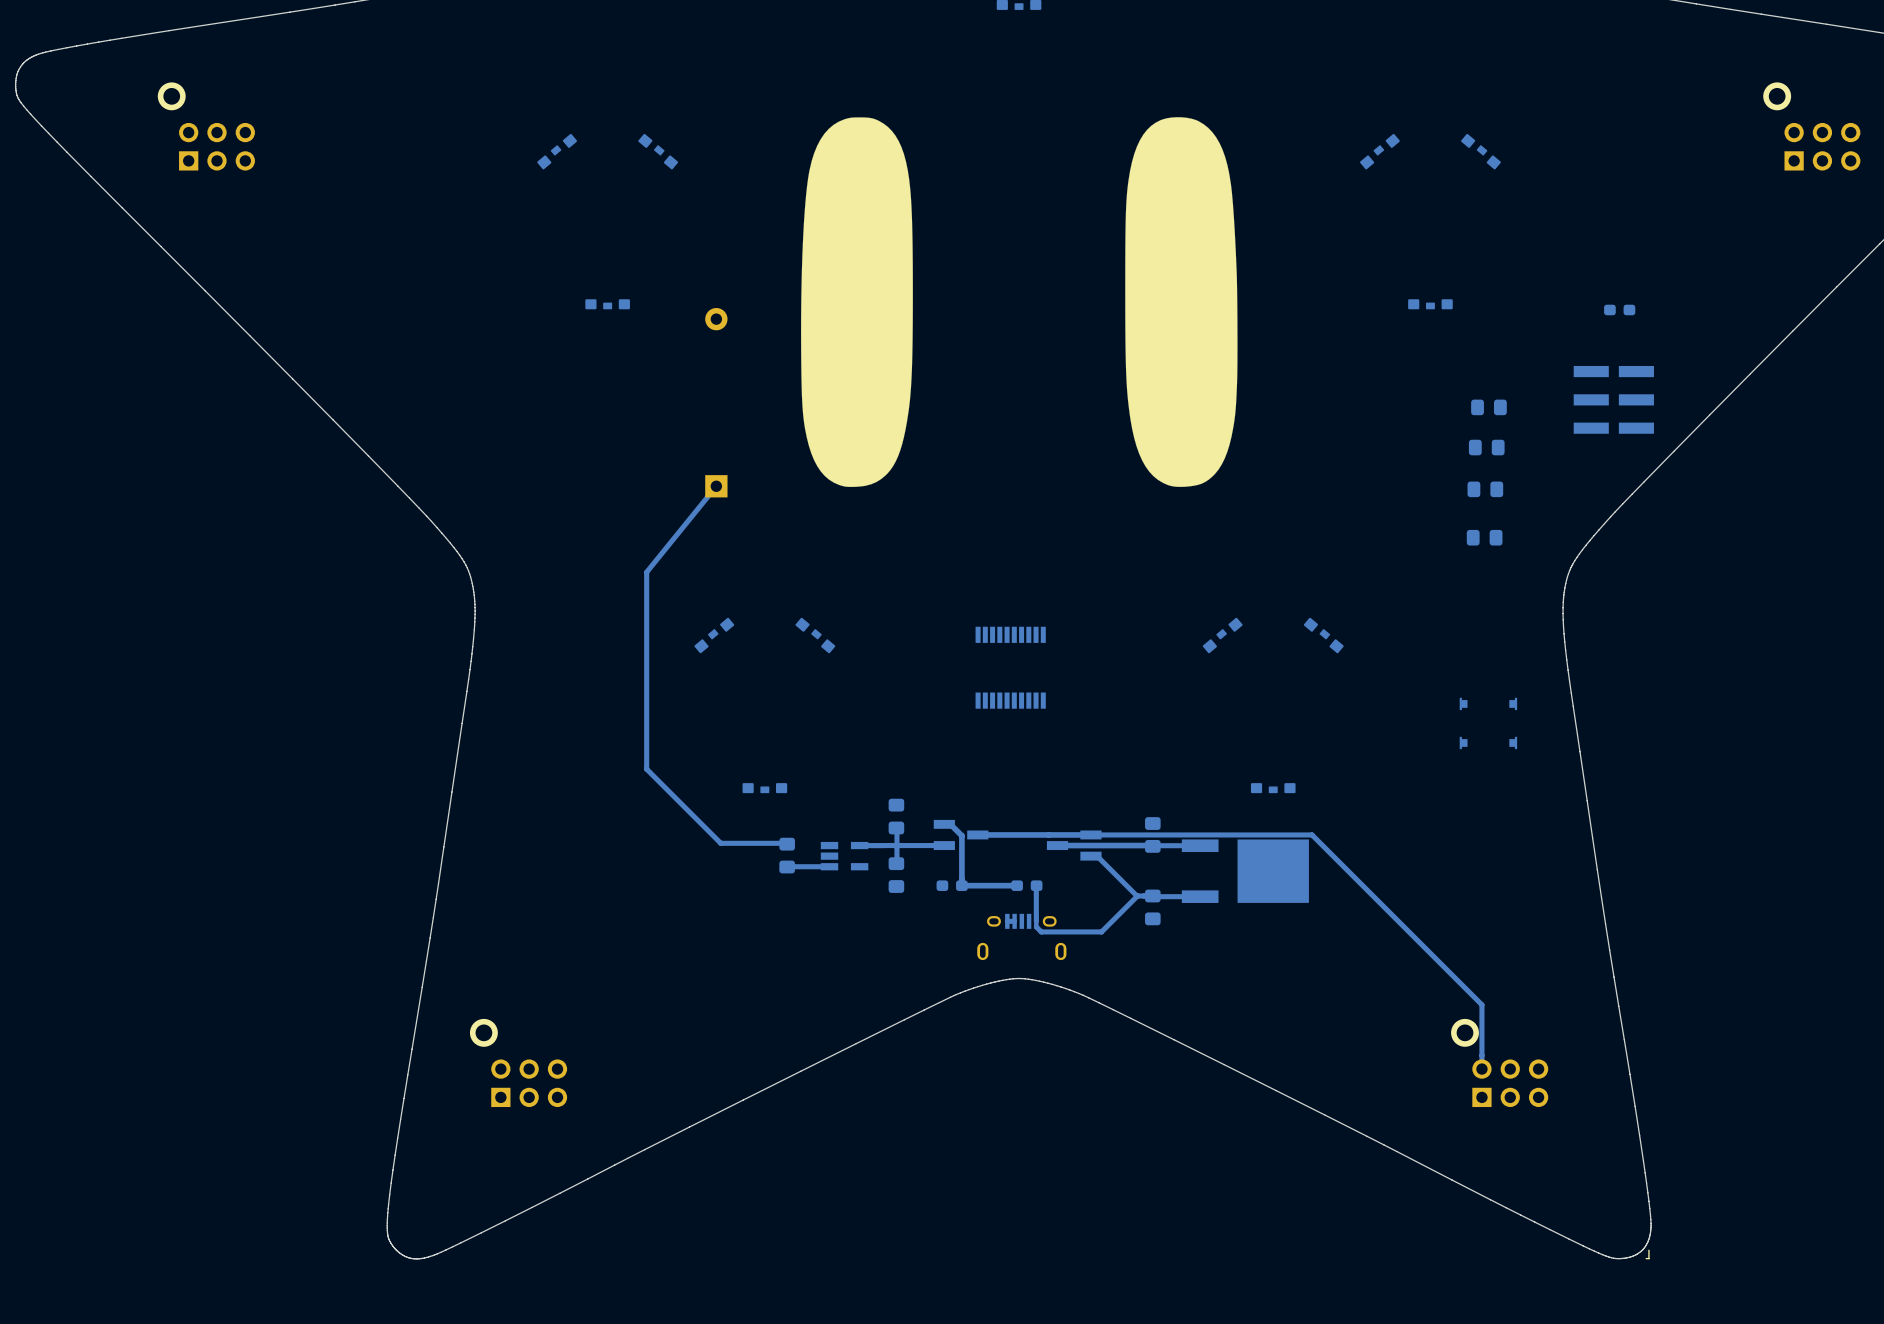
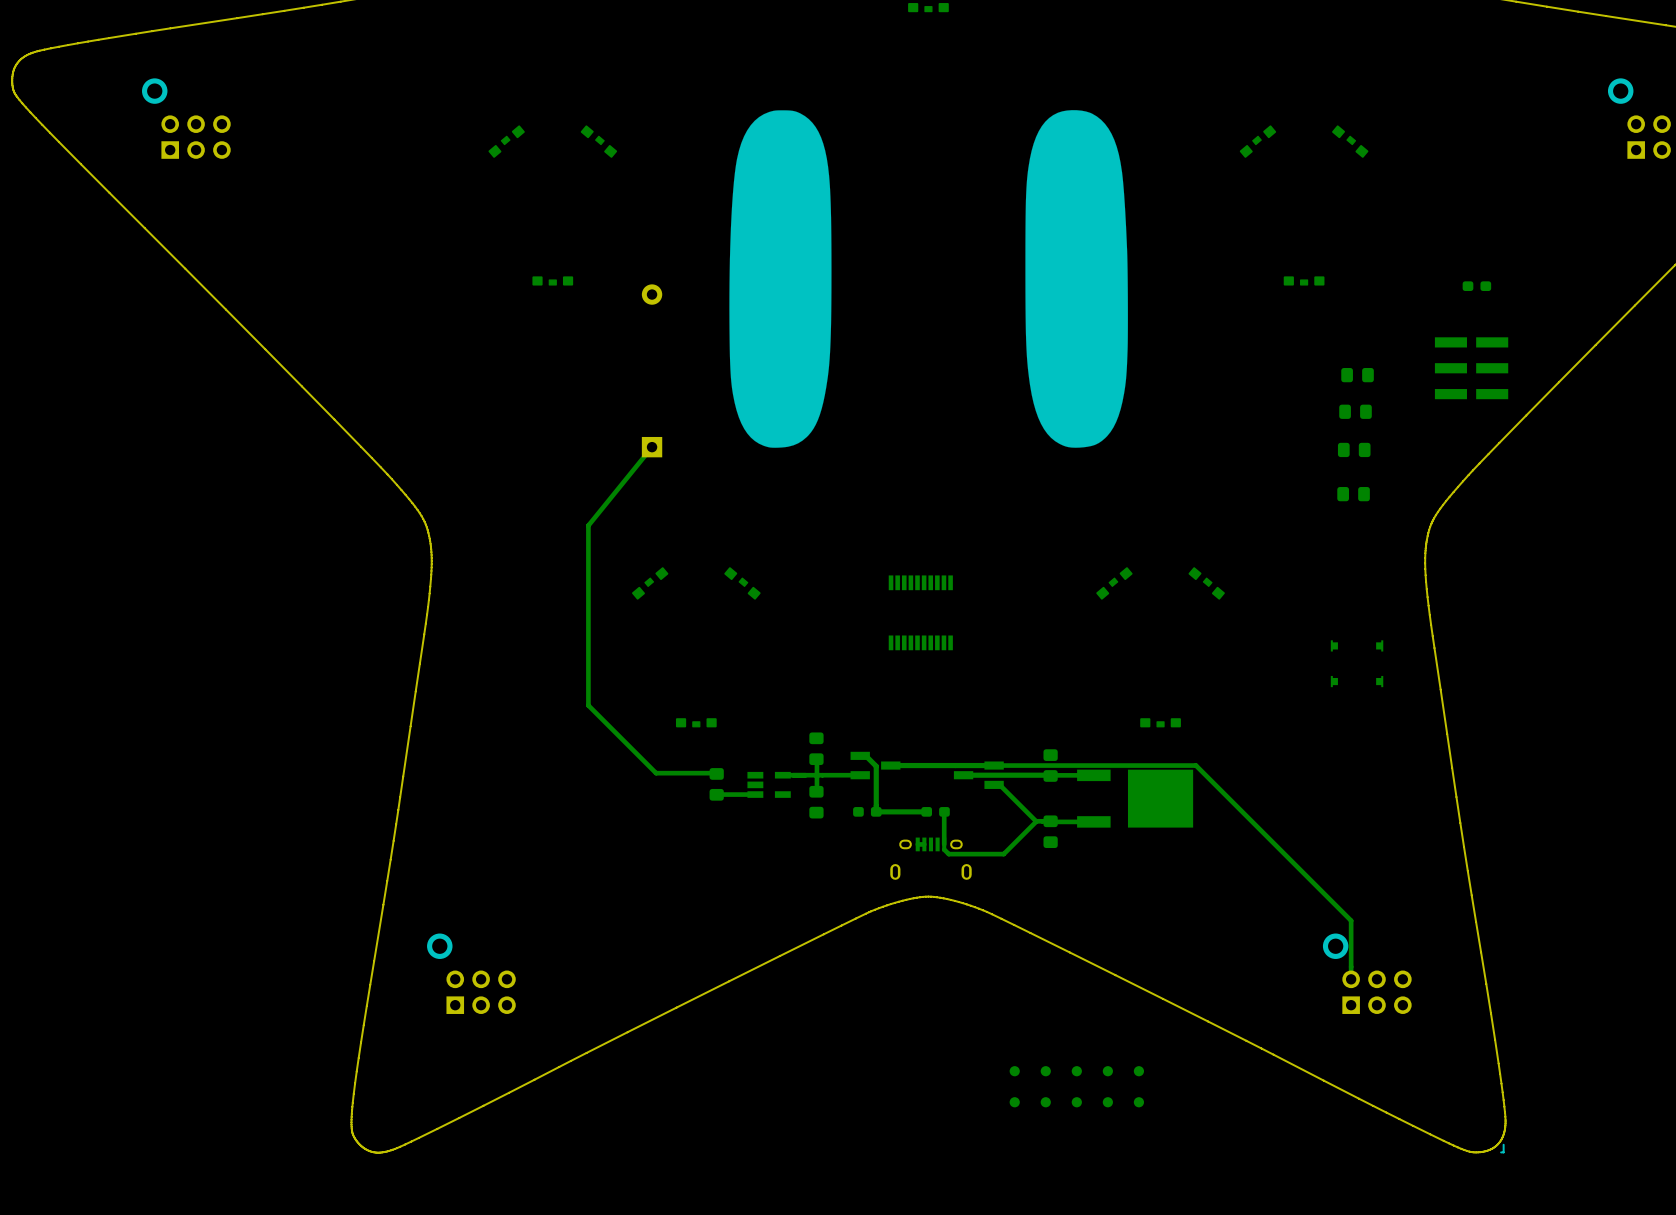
part: none -> (1014, 1071)
part: none -> (1045, 1071)
part: none -> (1076, 1071)
part: none -> (1107, 1071)
part: none -> (1138, 1071)
part: none -> (1014, 1102)
part: none -> (1045, 1102)
part: none -> (1076, 1102)
part: none -> (1107, 1102)
part: none -> (1138, 1102)

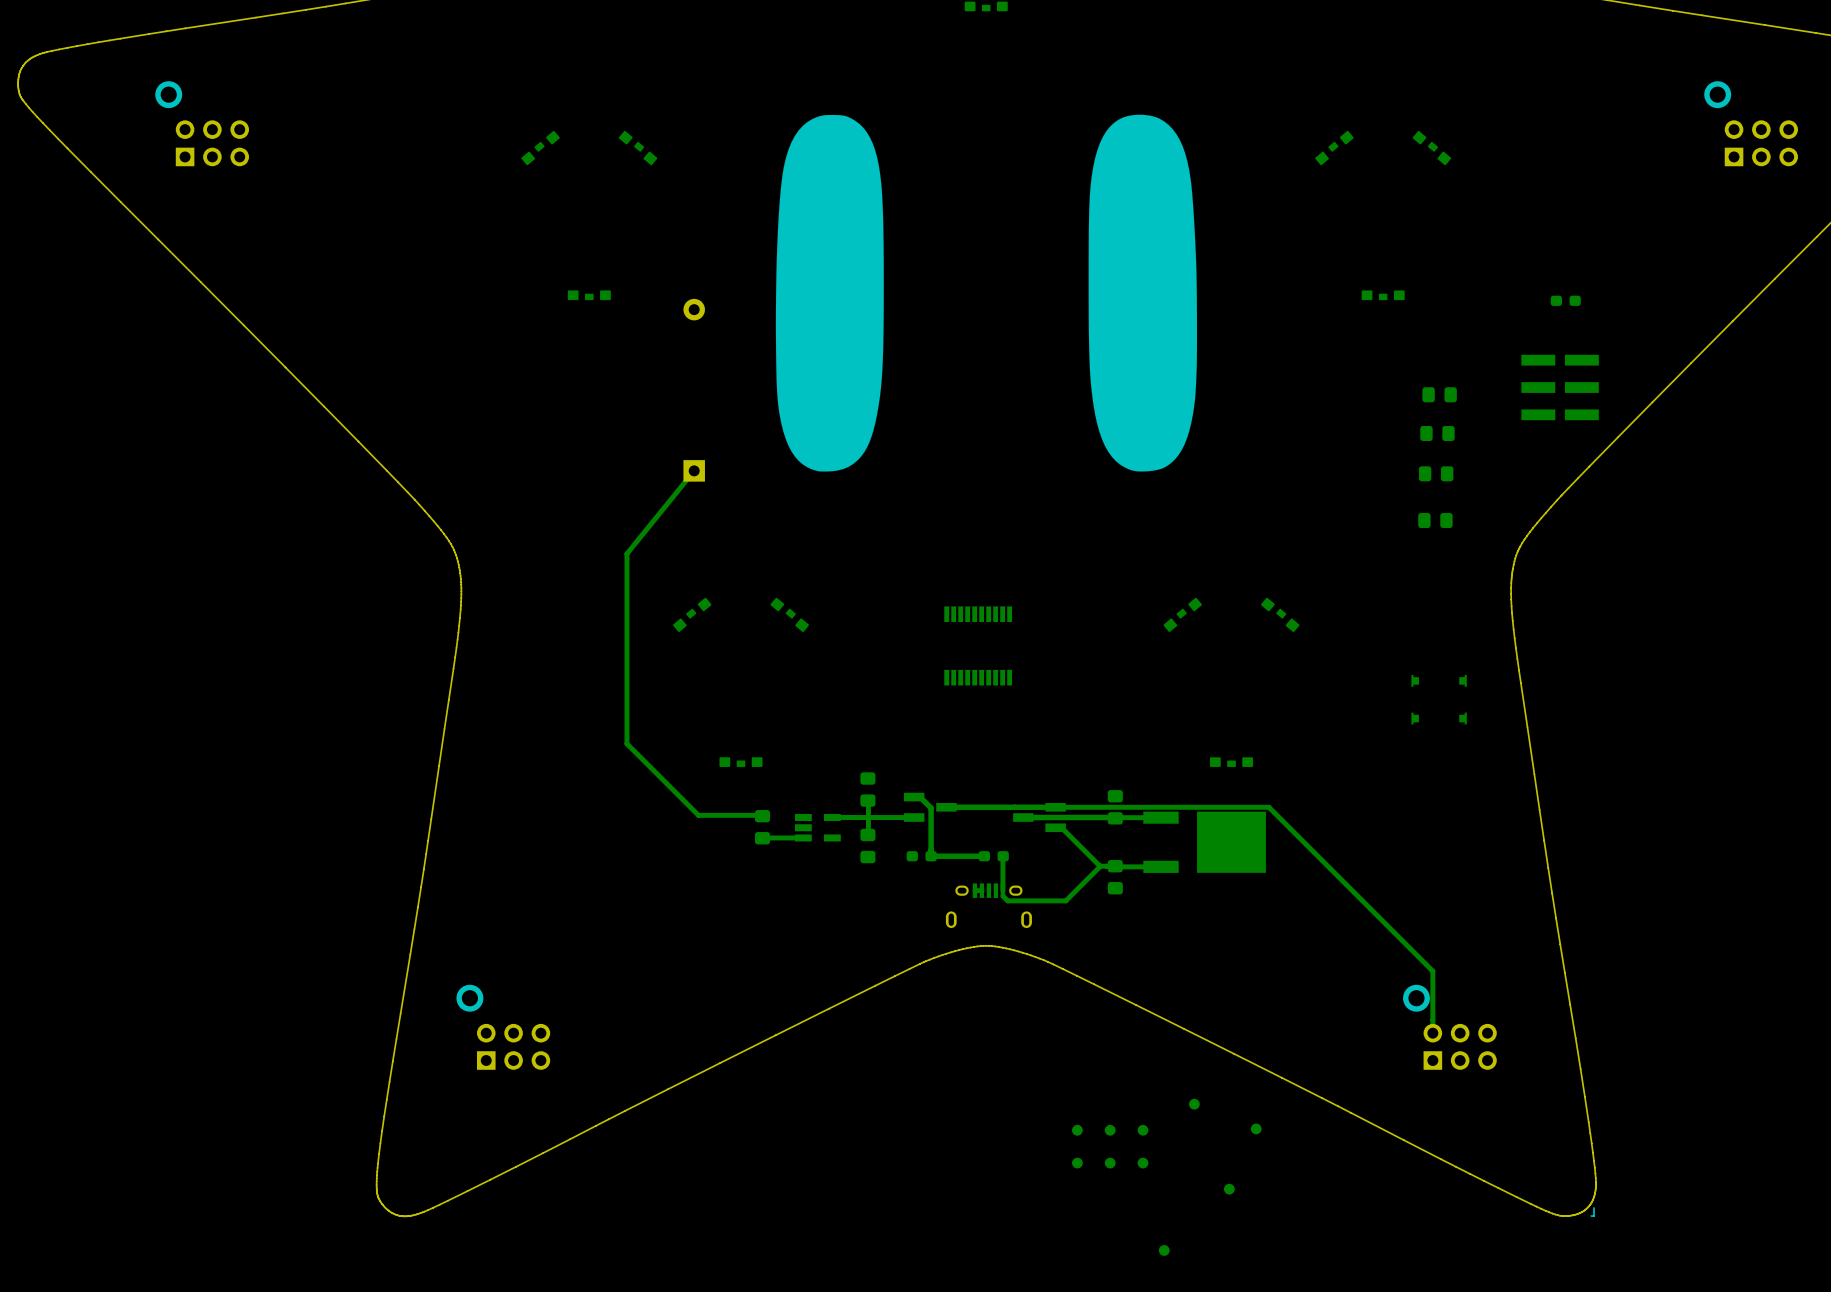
part: none -> (1194, 1104)
part: none -> (1256, 1128)
part: (1107, 1071) -> none
part: (1138, 1071) -> none
part: (1107, 1102) -> none
part: (1138, 1102) -> none
part: none -> (1229, 1189)
part: none -> (1164, 1250)

